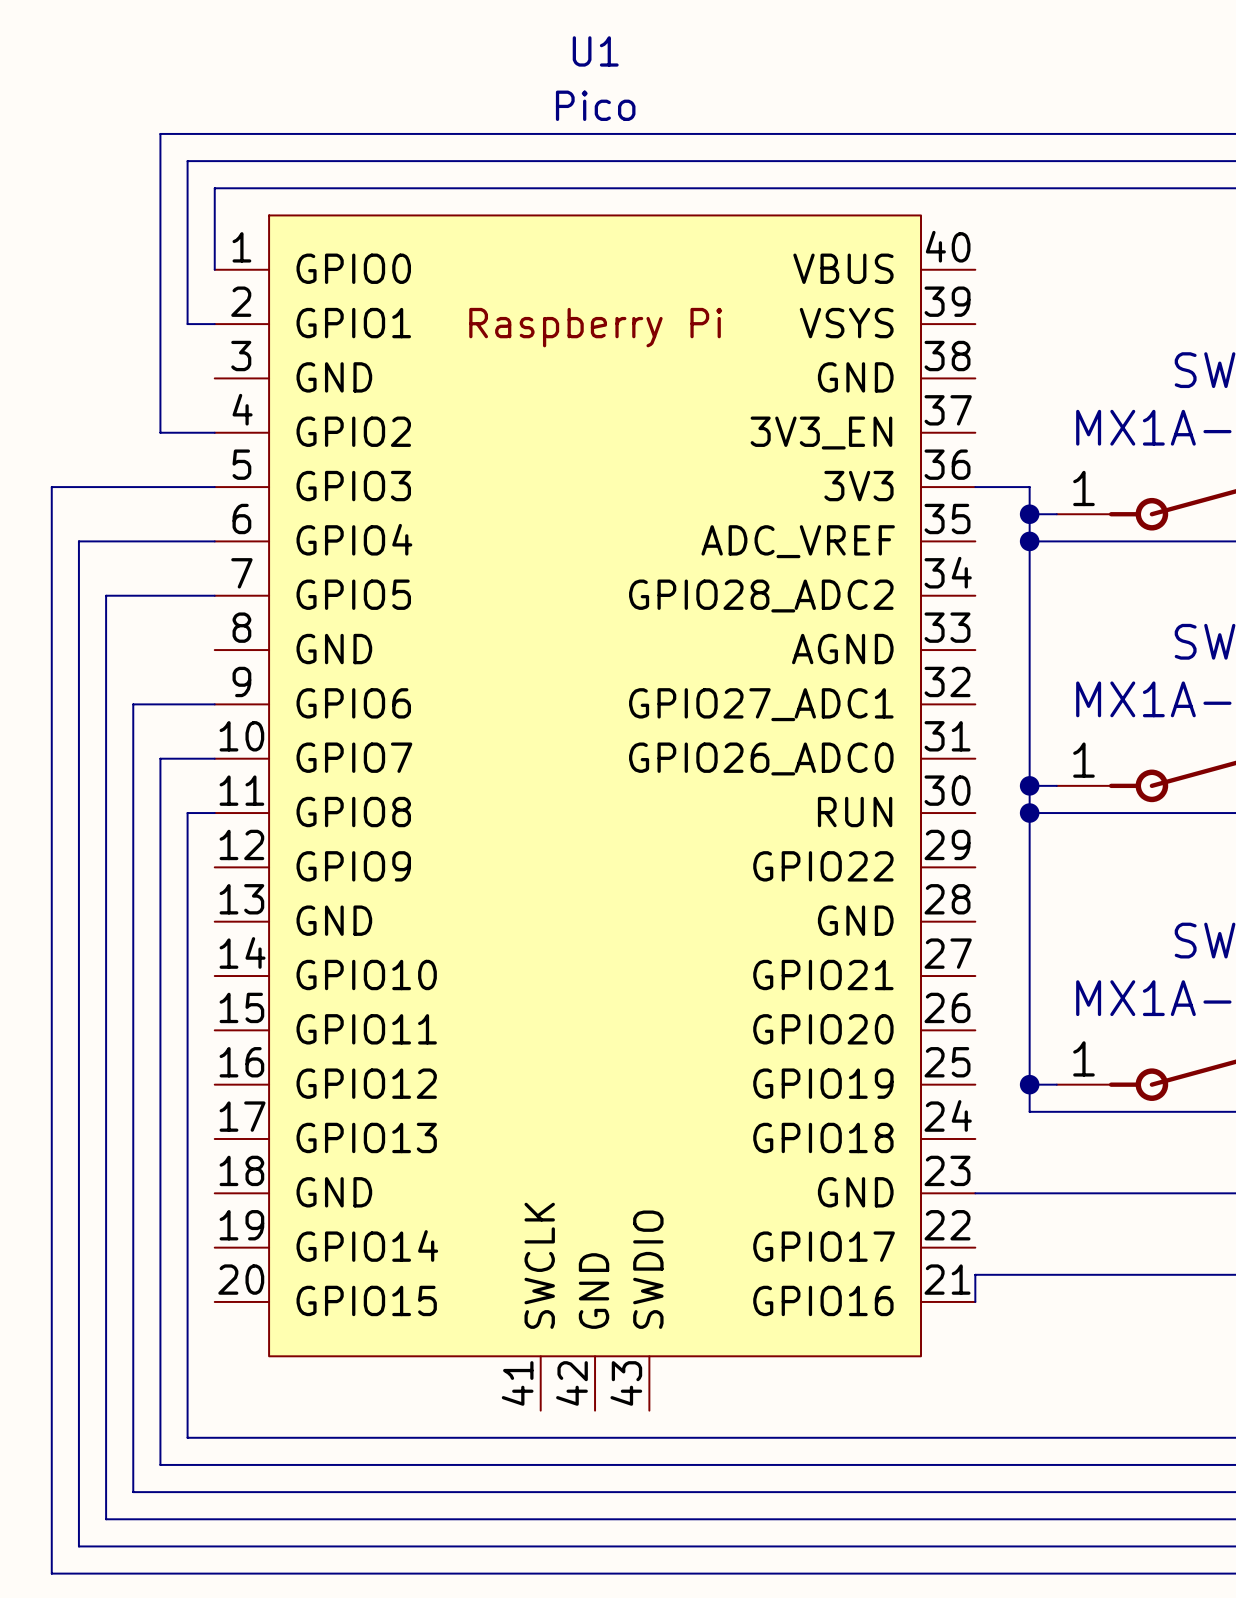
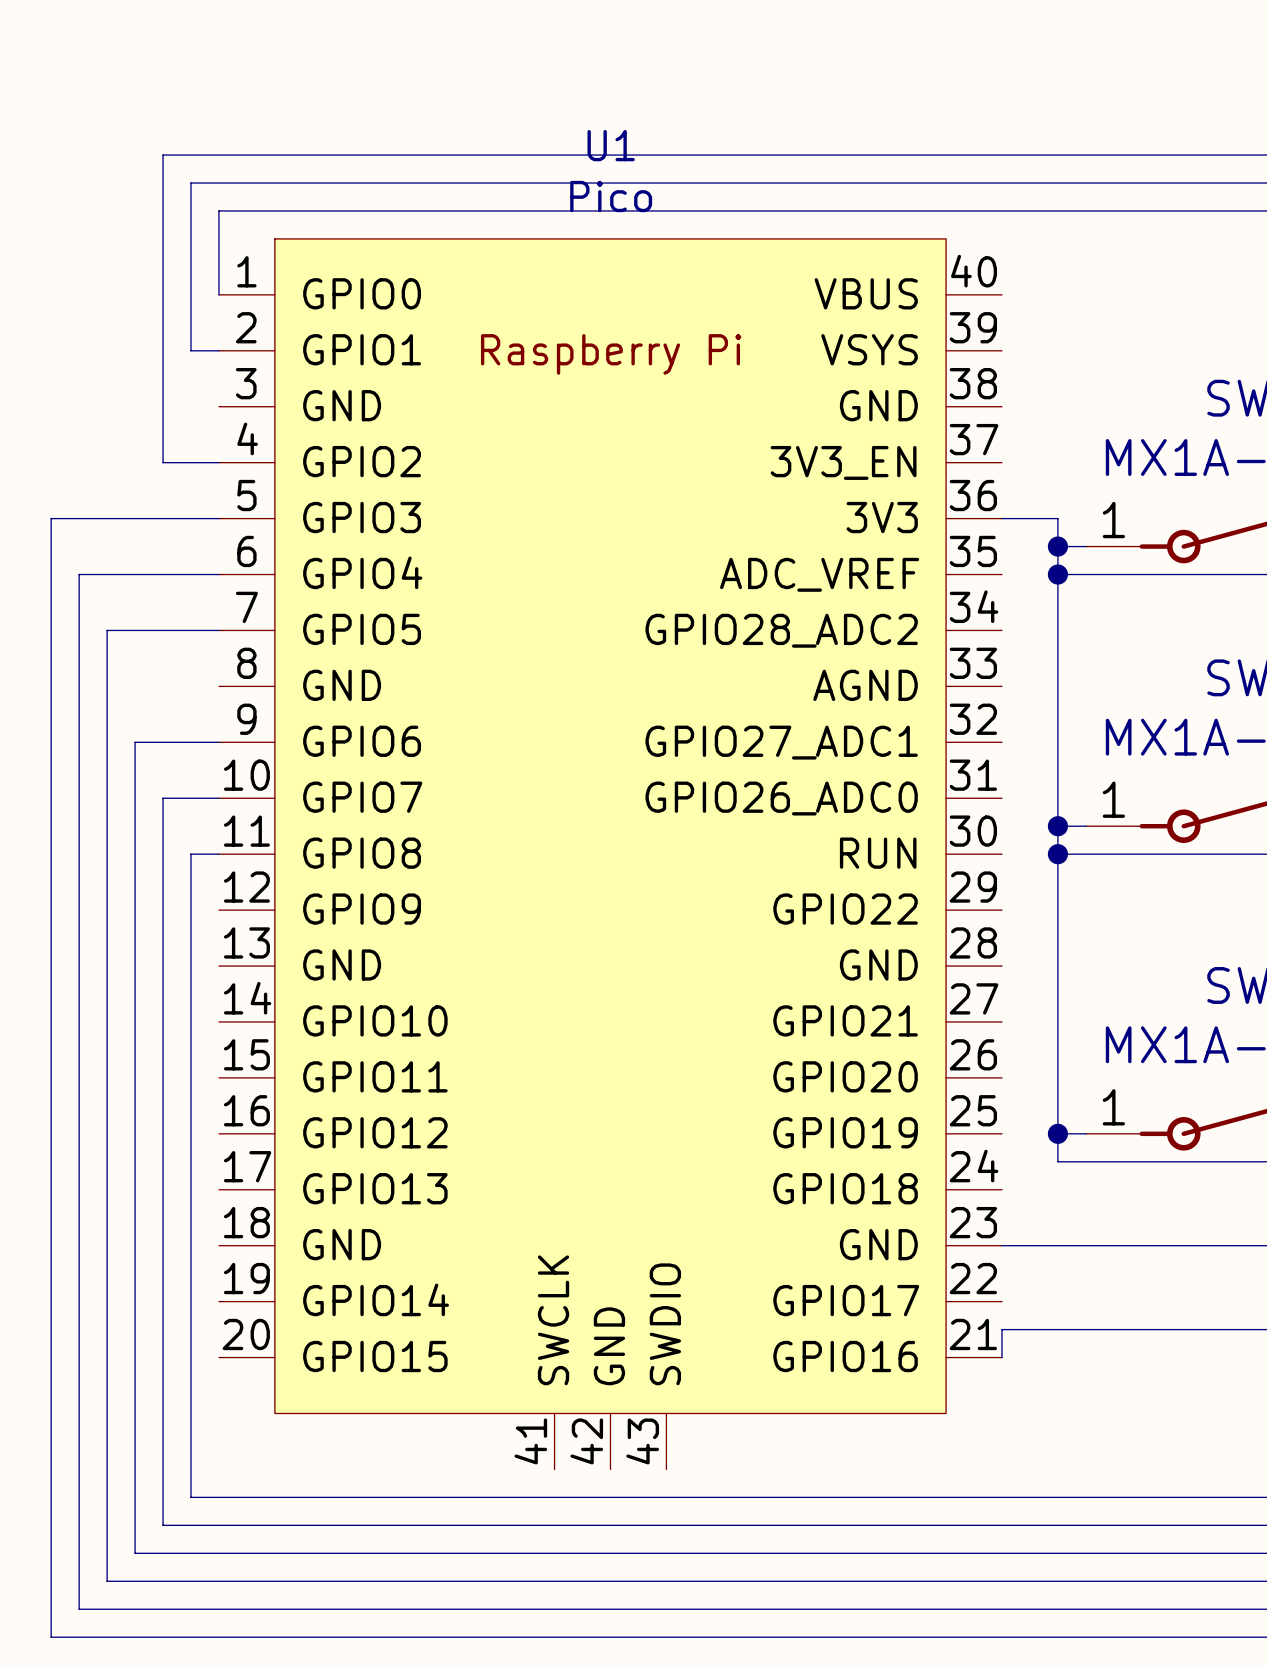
U1 name position: U1 (595, 51) -> U1 (611, 145)
U1 value position: Pico (595, 105) -> Pico (611, 196)

